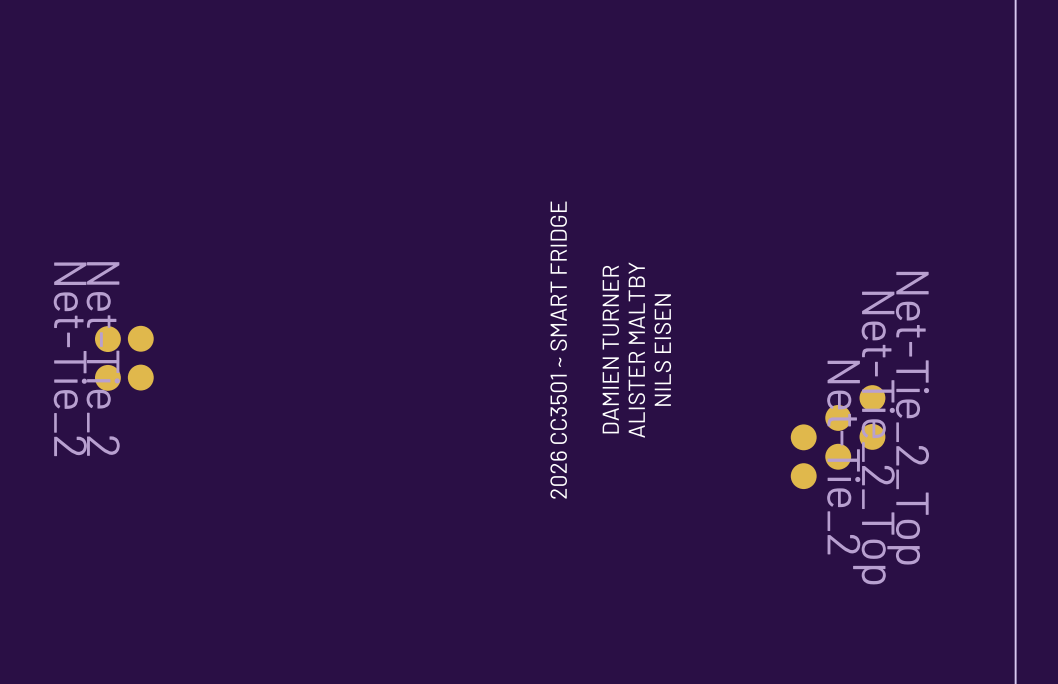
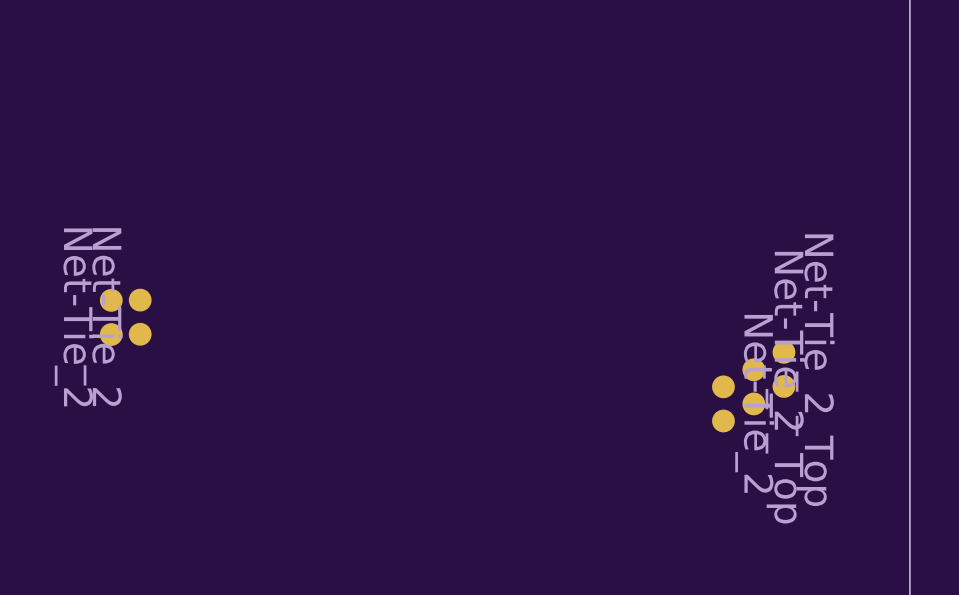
text: DAMIEN TURNER (610, 349) -> none
text: 2026 CC3501 ~ SMART FRIDGE (558, 350) -> none
text: ALISTER MALTBY (636, 350) -> none
text: NILS EISEN (662, 350) -> none

